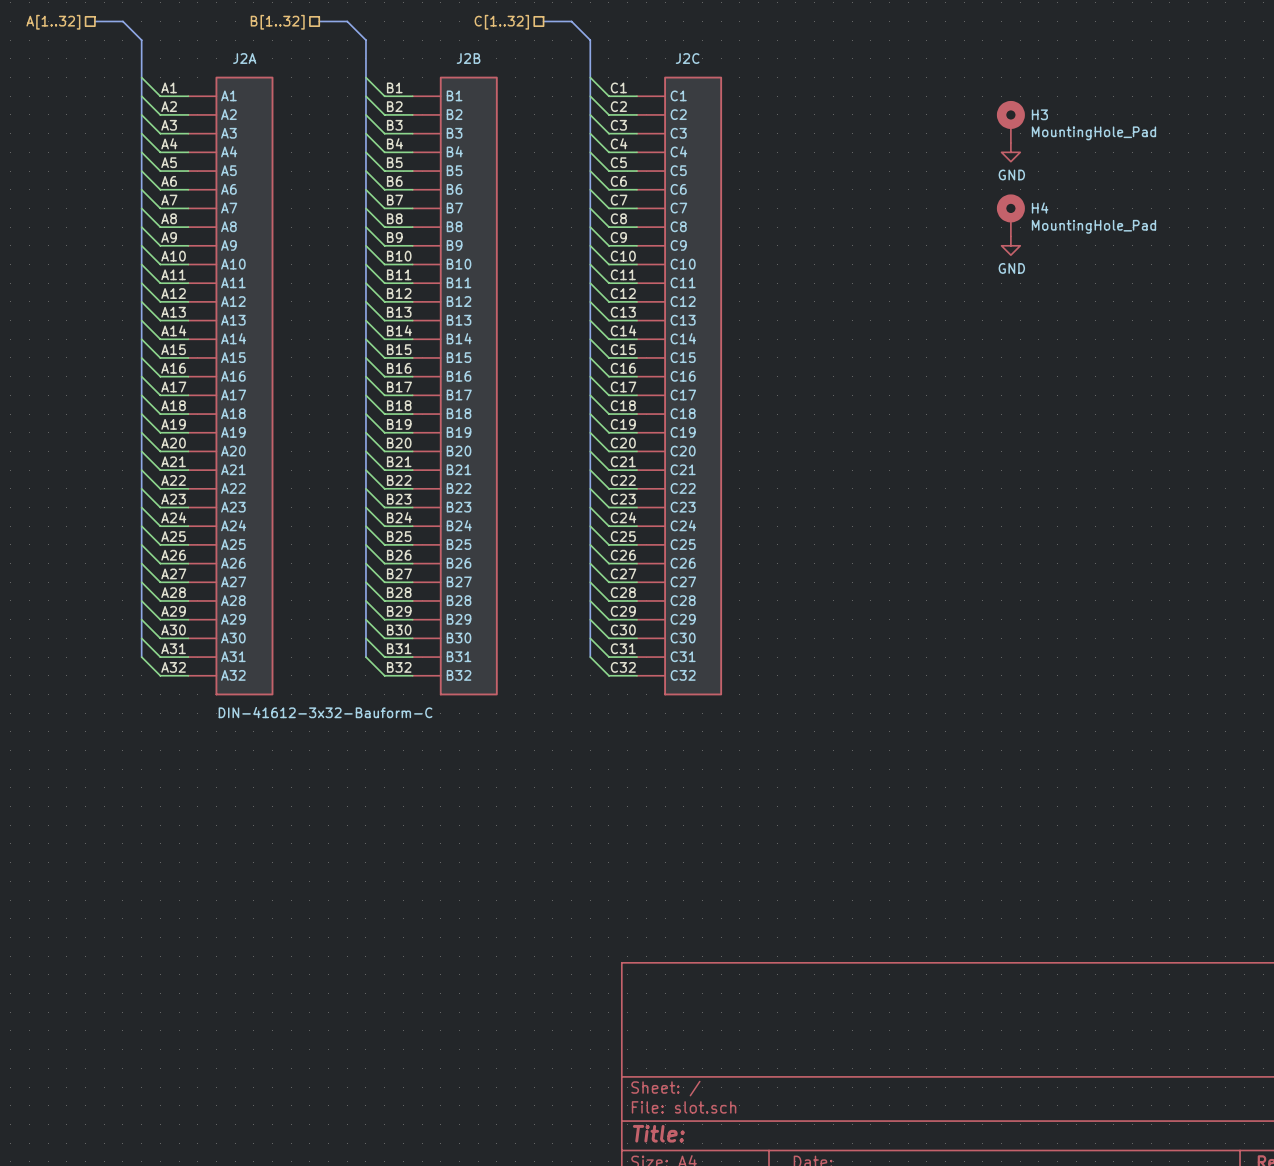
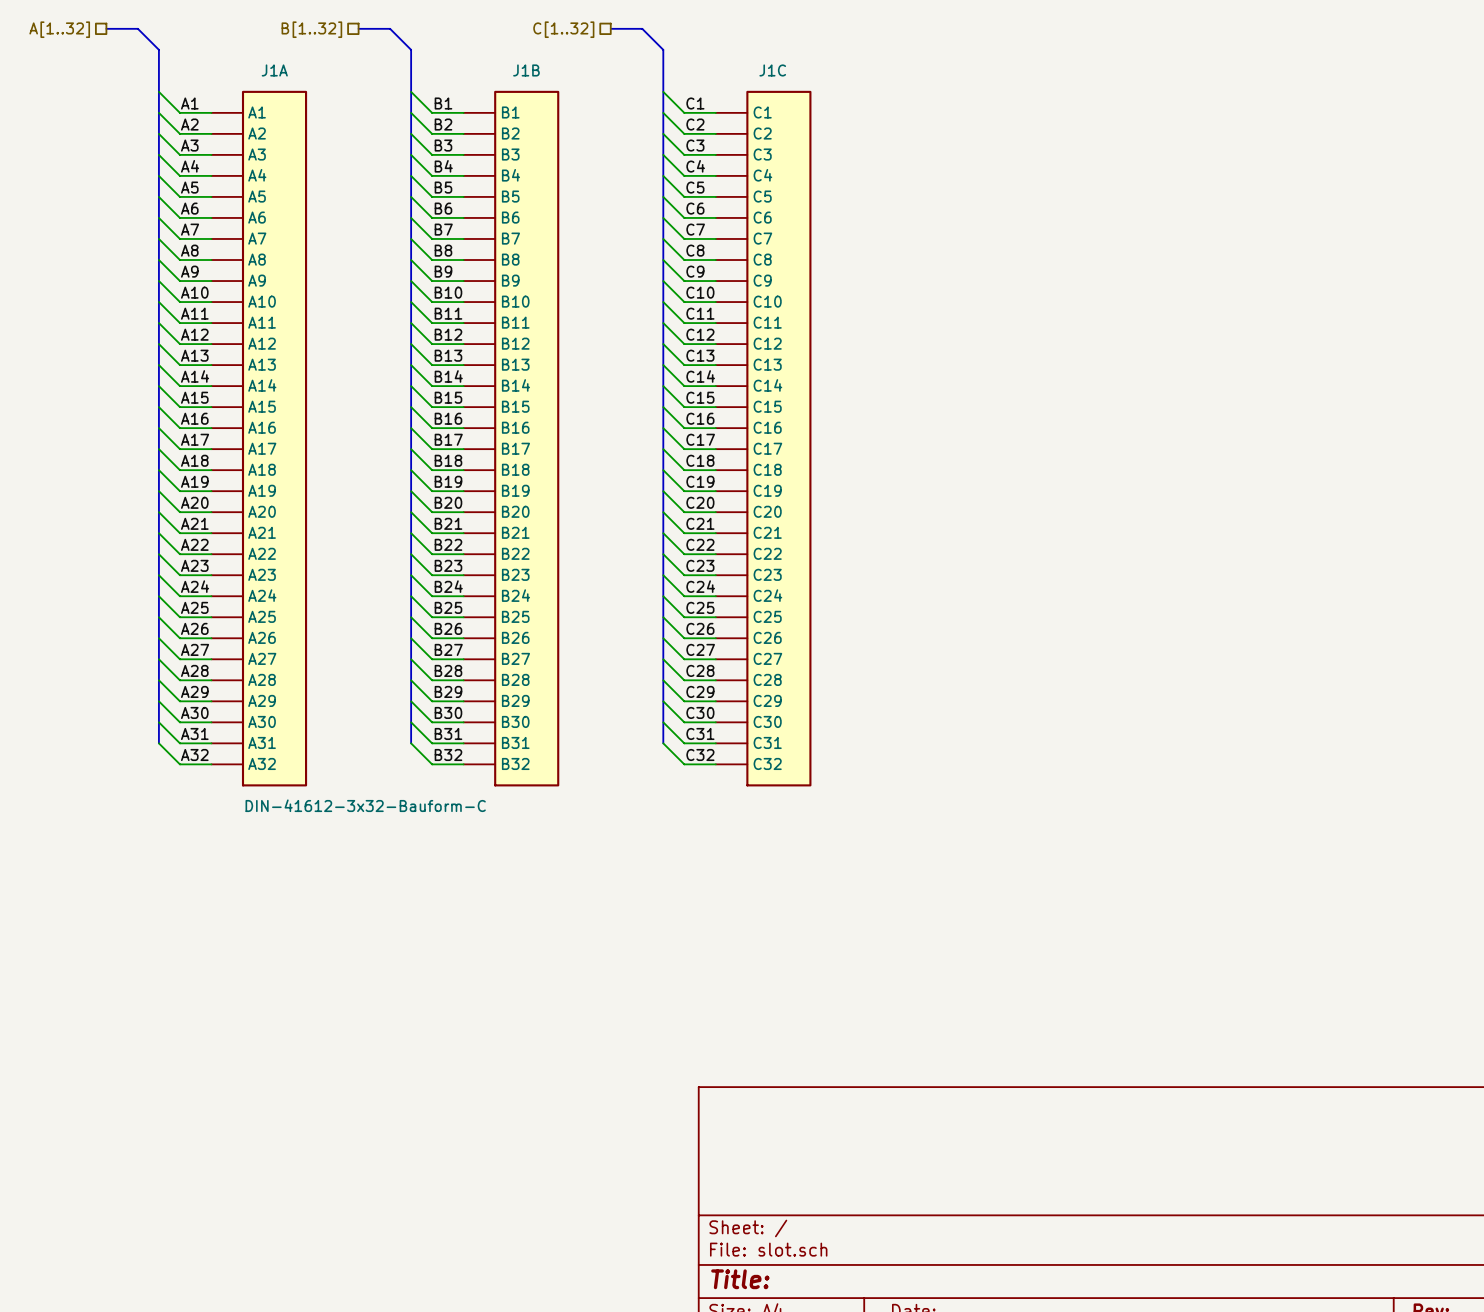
J2A name: J2A (244, 58) -> J1A (274, 70)
J2B name: J2B (468, 58) -> J1B (526, 70)
J2C name: J2C (687, 58) -> J1C (772, 70)
H3: MountingHole_Pad (1010, 121) -> none
power symbol: GND (1010, 152) -> none
H4: MountingHole_Pad (1010, 215) -> none
power symbol: GND (1010, 245) -> none

